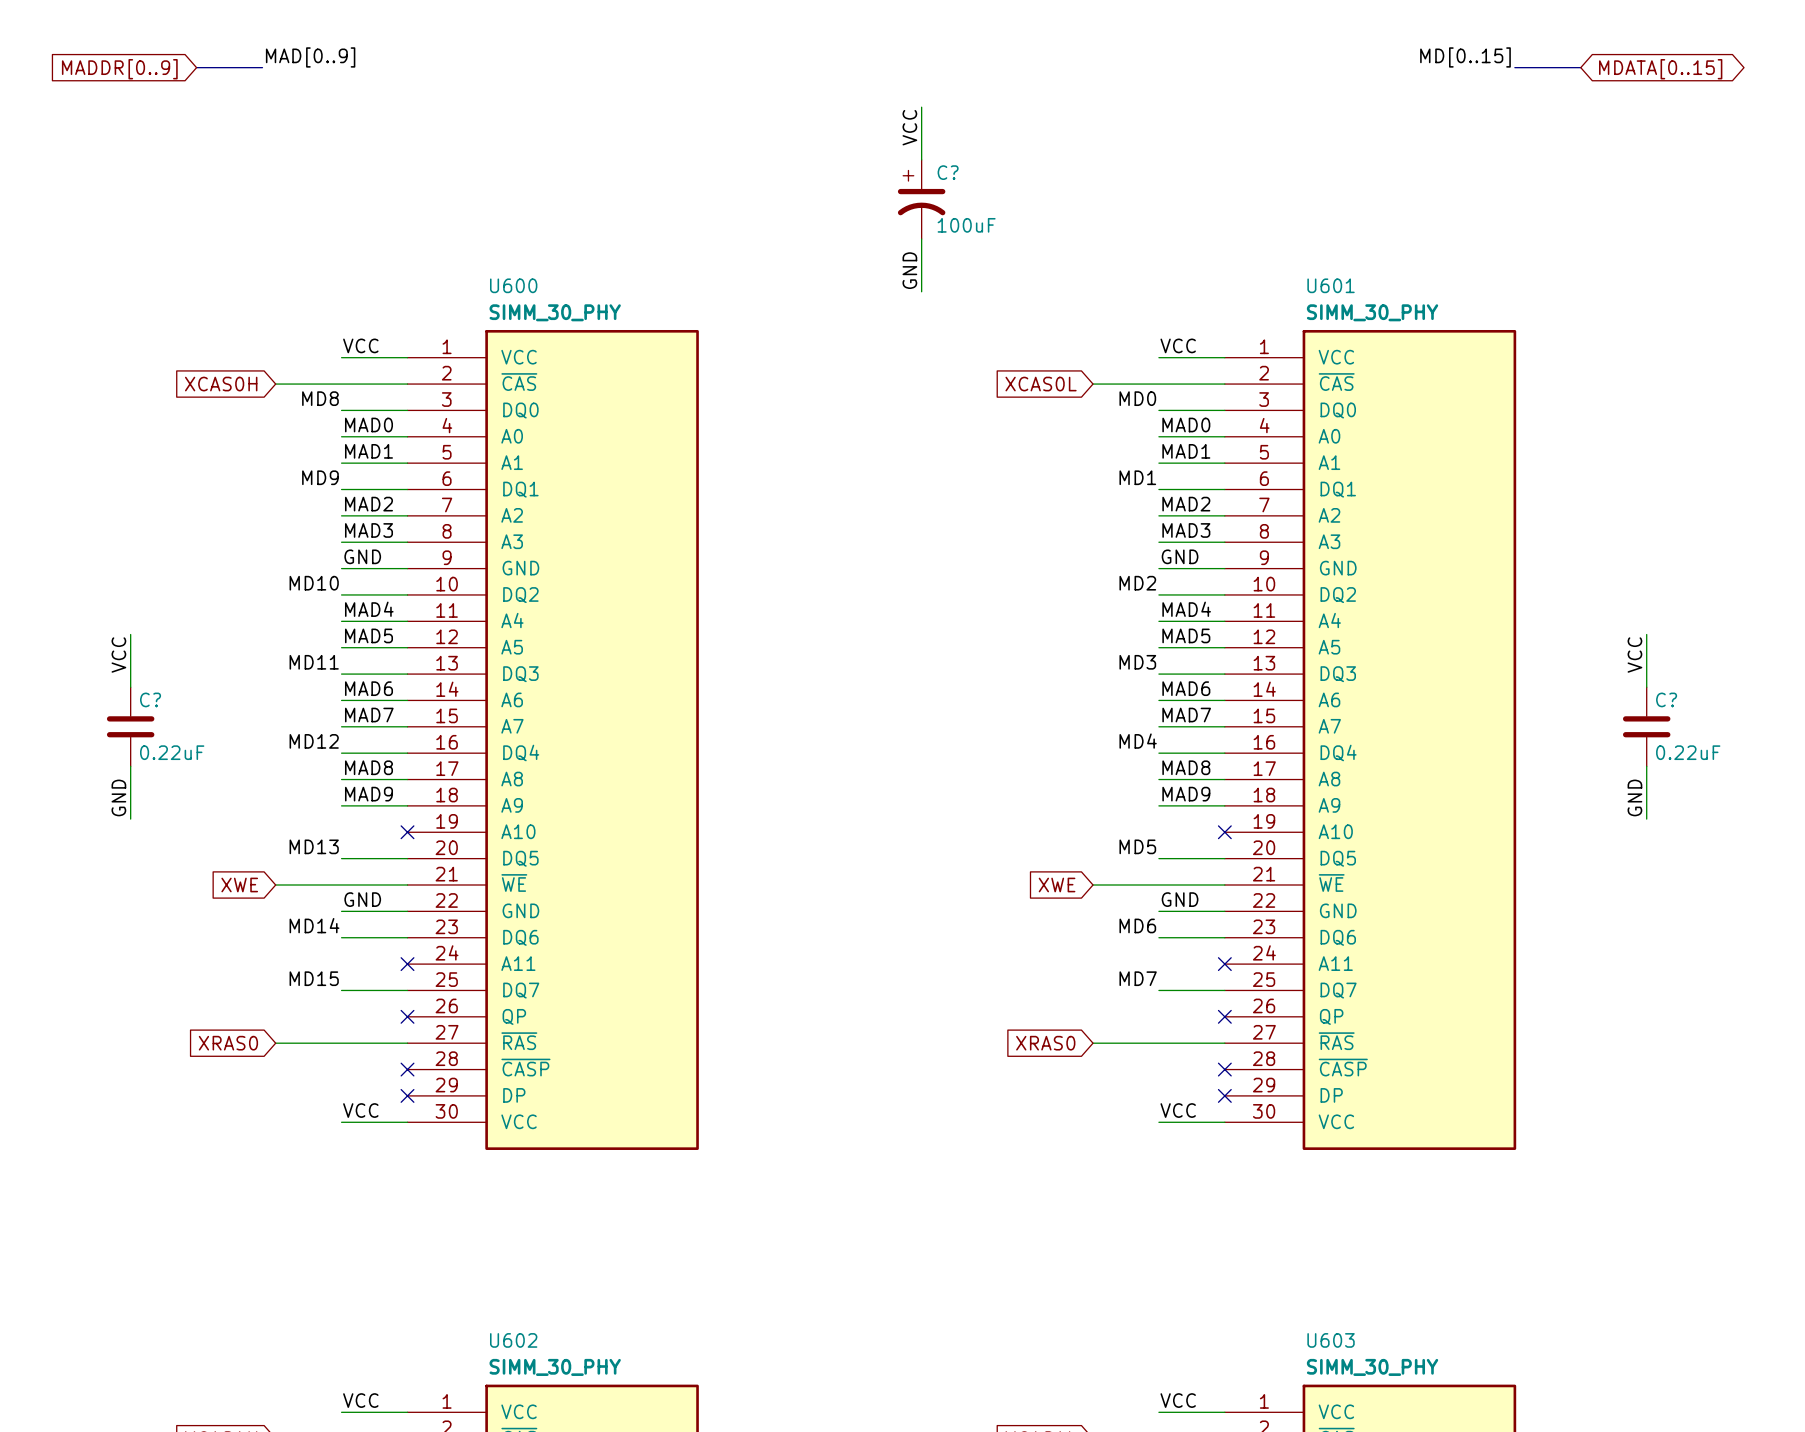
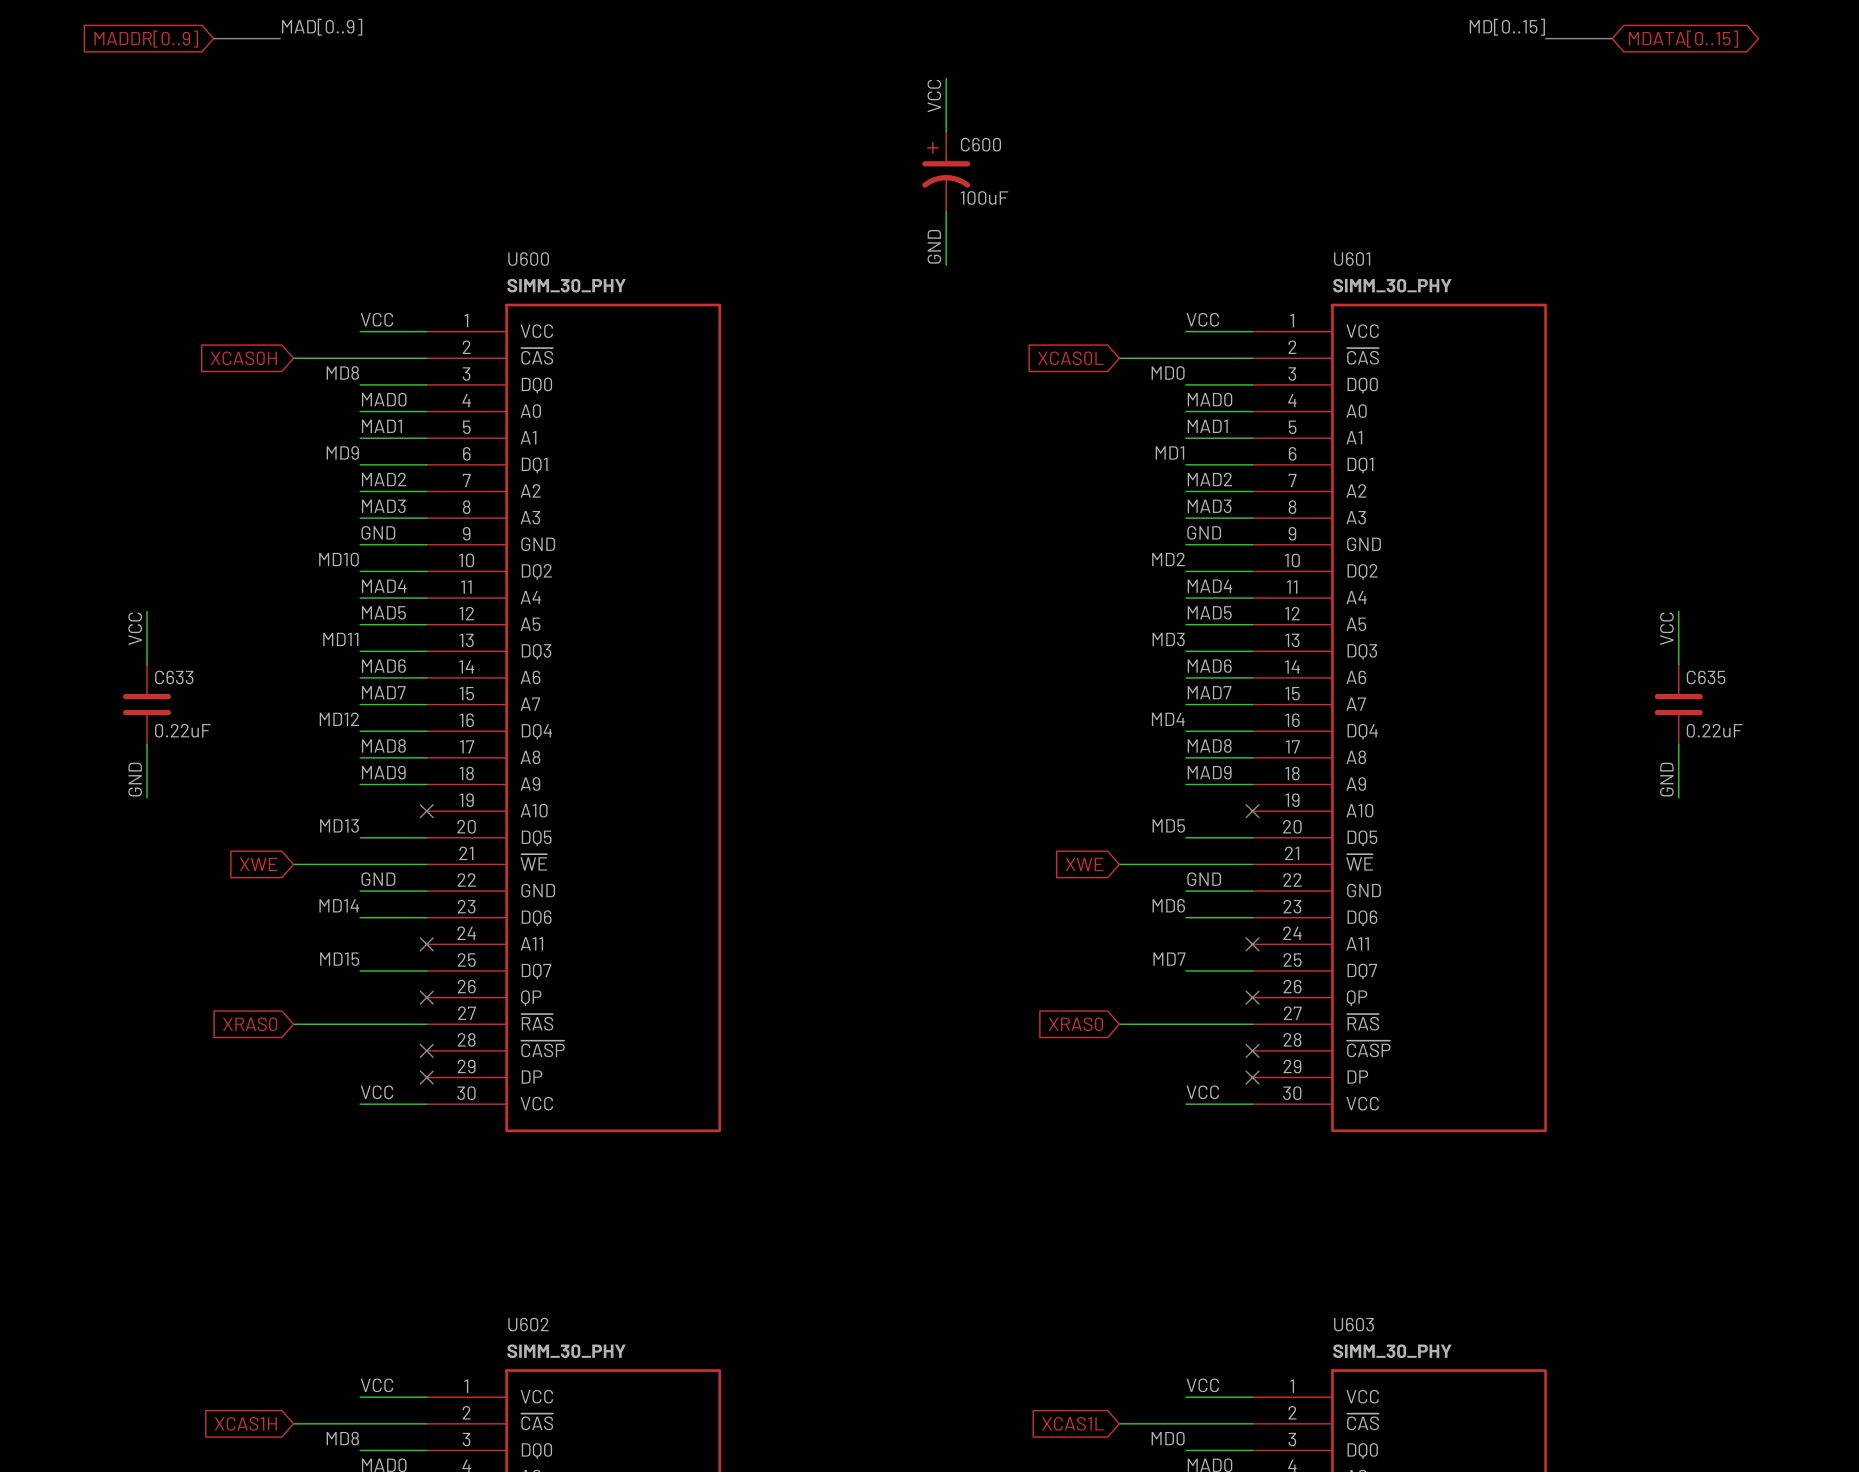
C? name: C? (948, 172) -> C600 (980, 144)
C? name: C? (150, 699) -> C633 (174, 677)
C? name: C? (1666, 699) -> C635 (1706, 677)

